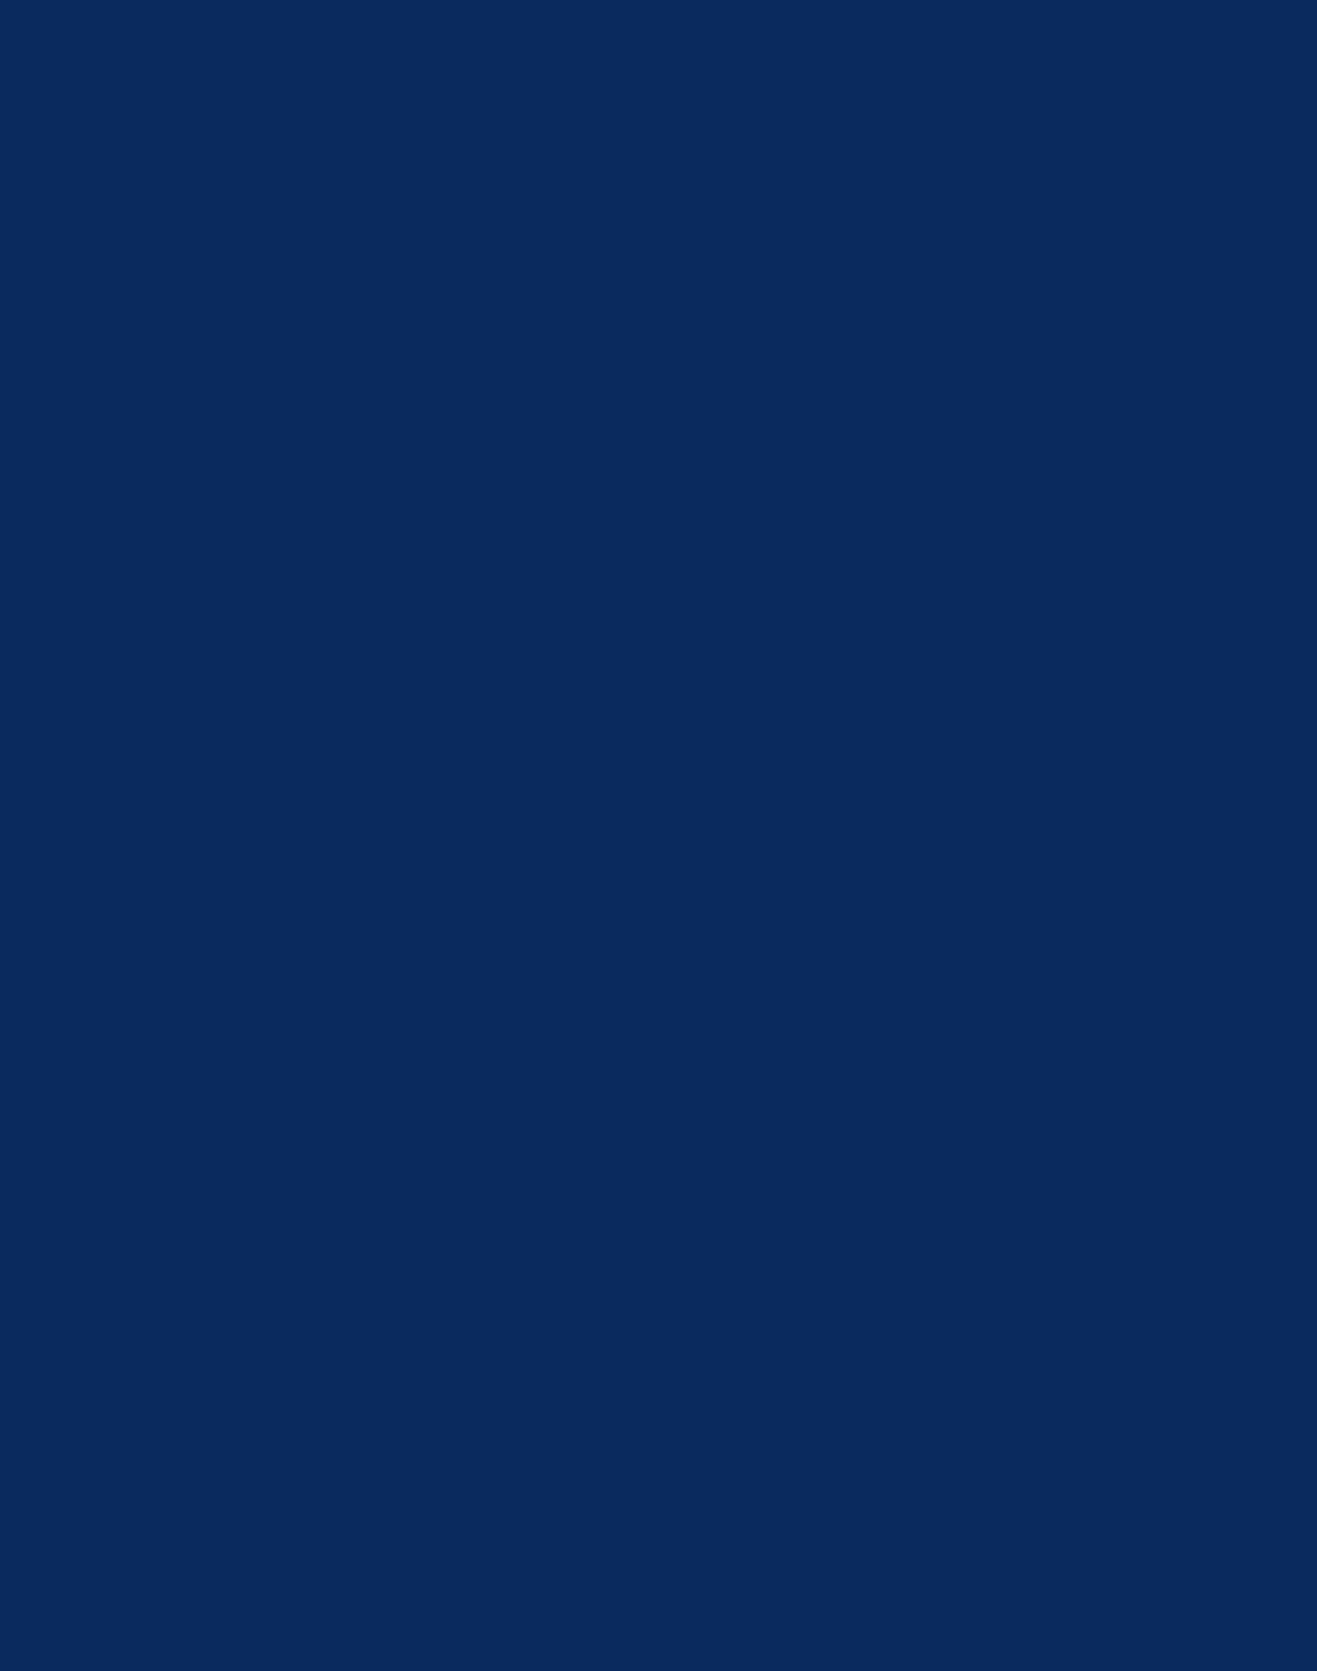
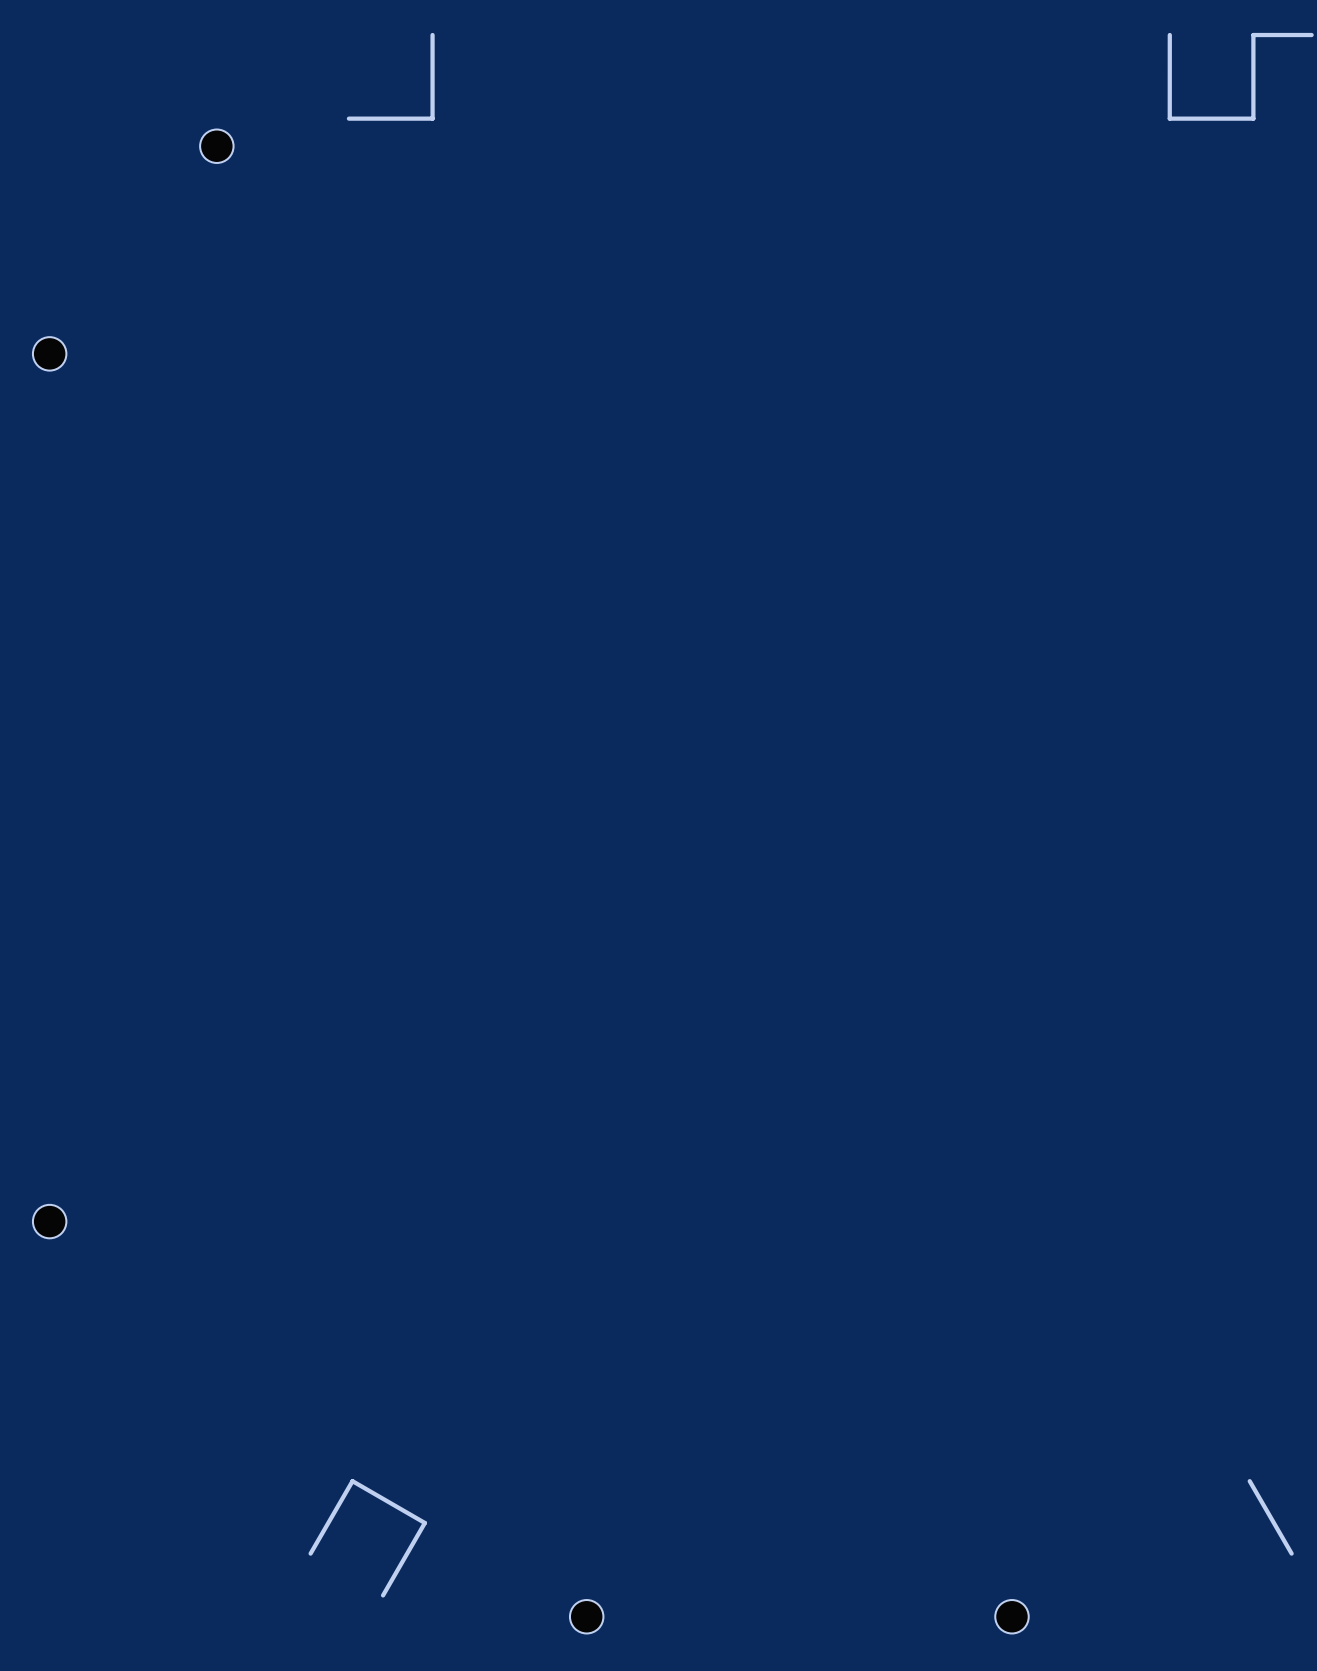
board edge: none -> (432, 35) (432, 118) (348, 118)
board edge: none -> (1169, 35) (1169, 118) (1253, 118) (1253, 35) (1311, 35)
hole: none -> (216, 146)
hole: none -> (49, 353)
hole: none -> (49, 1221)
board edge: none -> (1249, 1481) (1291, 1553)
board edge: none -> (310, 1553) (352, 1481) (424, 1522) (383, 1595)
hole: none -> (586, 1616)
hole: none -> (1011, 1616)

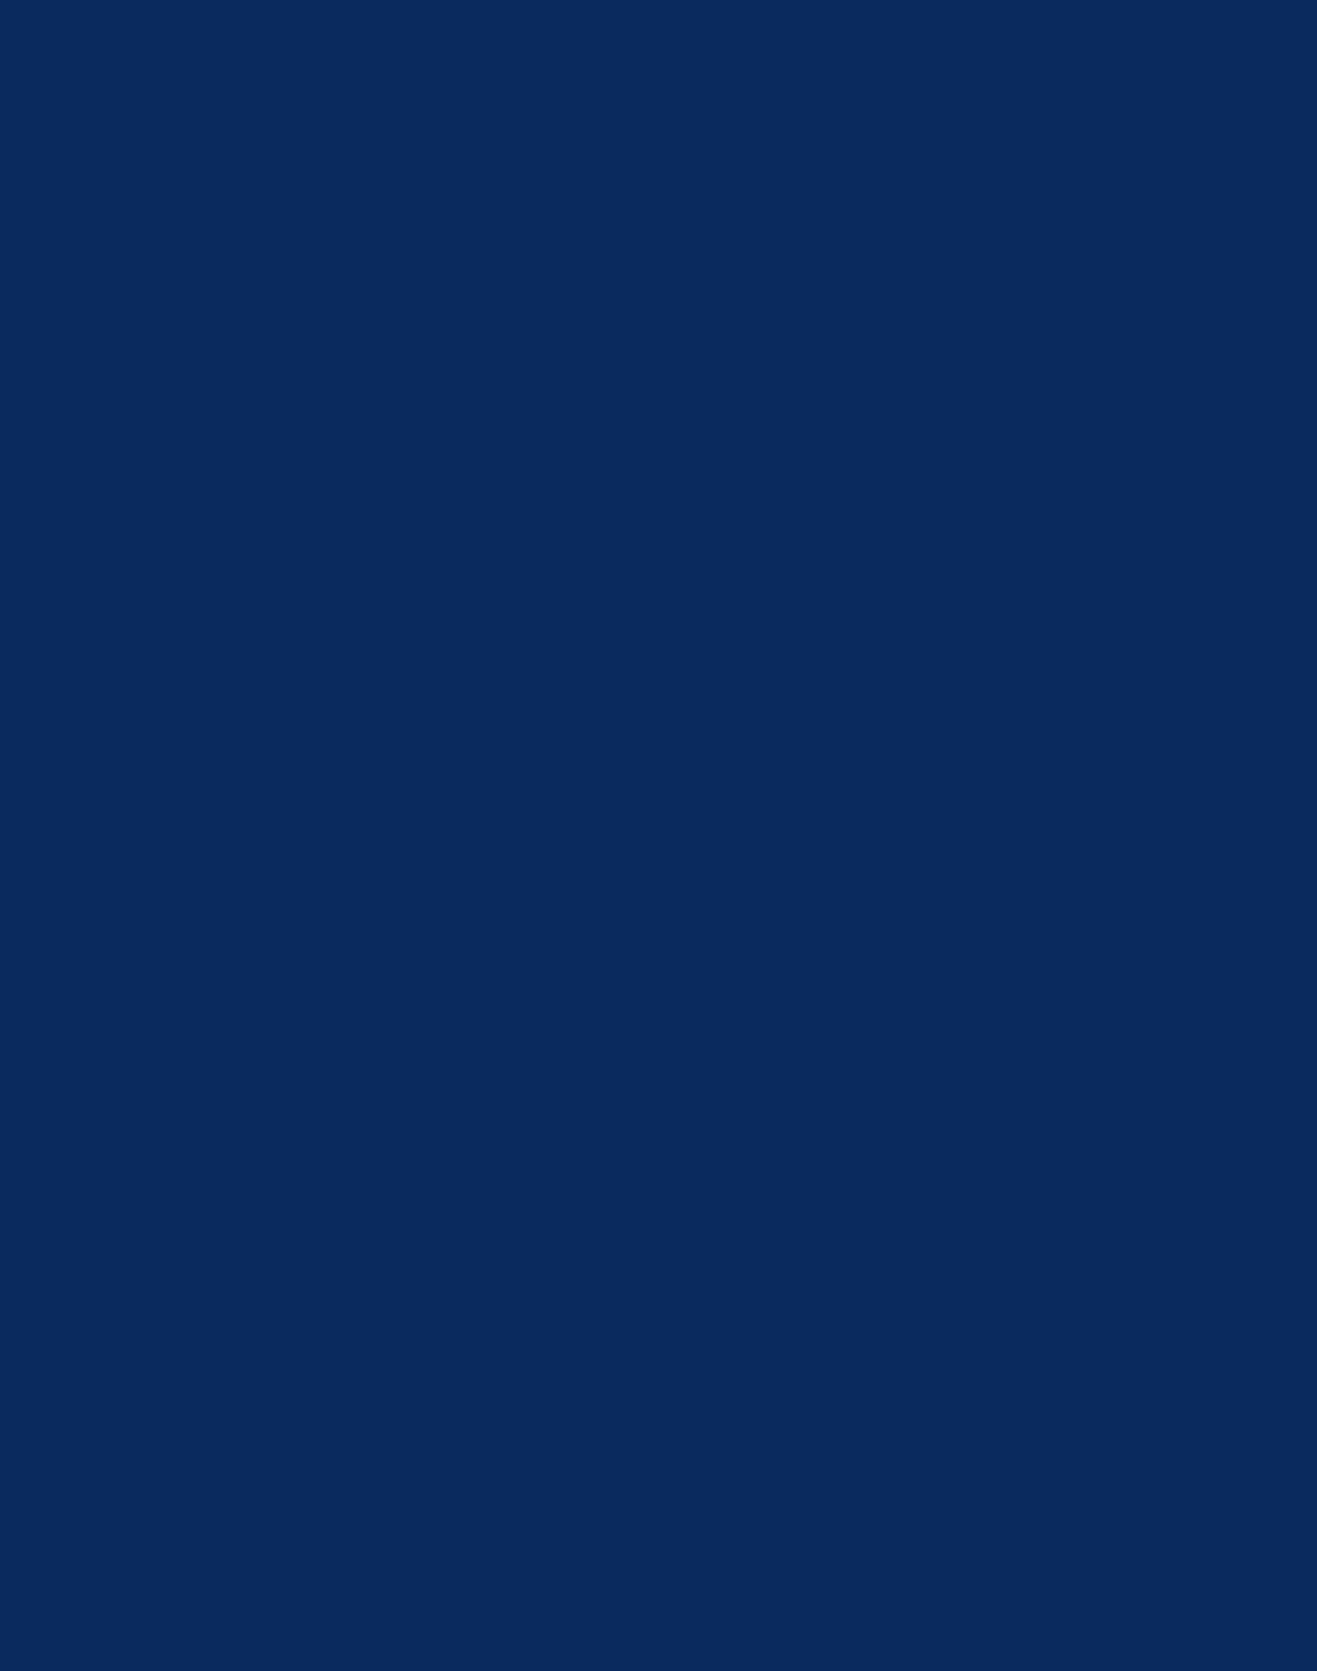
board edge: (432, 35) (432, 118) (348, 118) -> none
board edge: (1169, 35) (1169, 118) (1253, 118) (1253, 35) (1311, 35) -> none
hole: (216, 146) -> none
hole: (49, 353) -> none
hole: (49, 1221) -> none
board edge: (1249, 1481) (1291, 1553) -> none
board edge: (310, 1553) (352, 1481) (424, 1522) (383, 1595) -> none
hole: (586, 1616) -> none
hole: (1011, 1616) -> none

